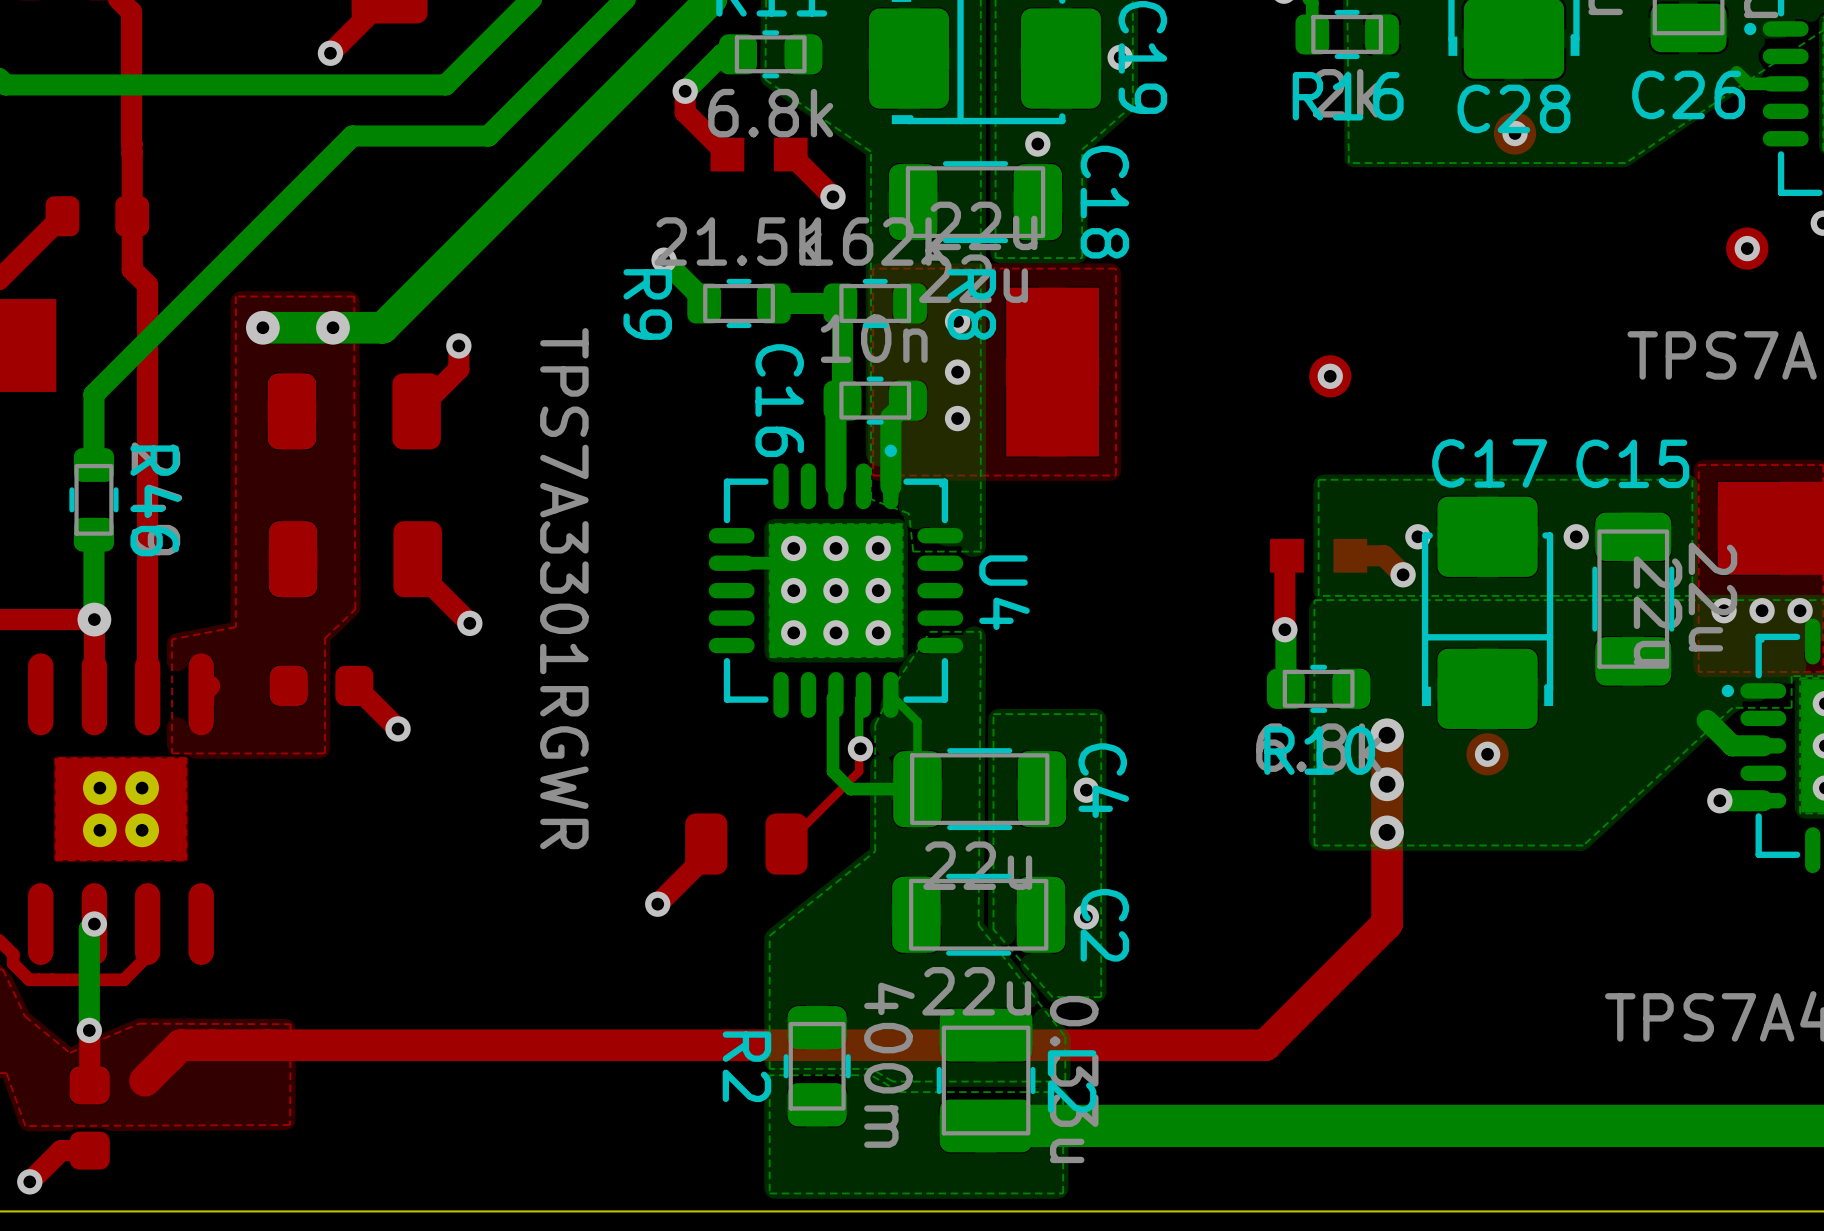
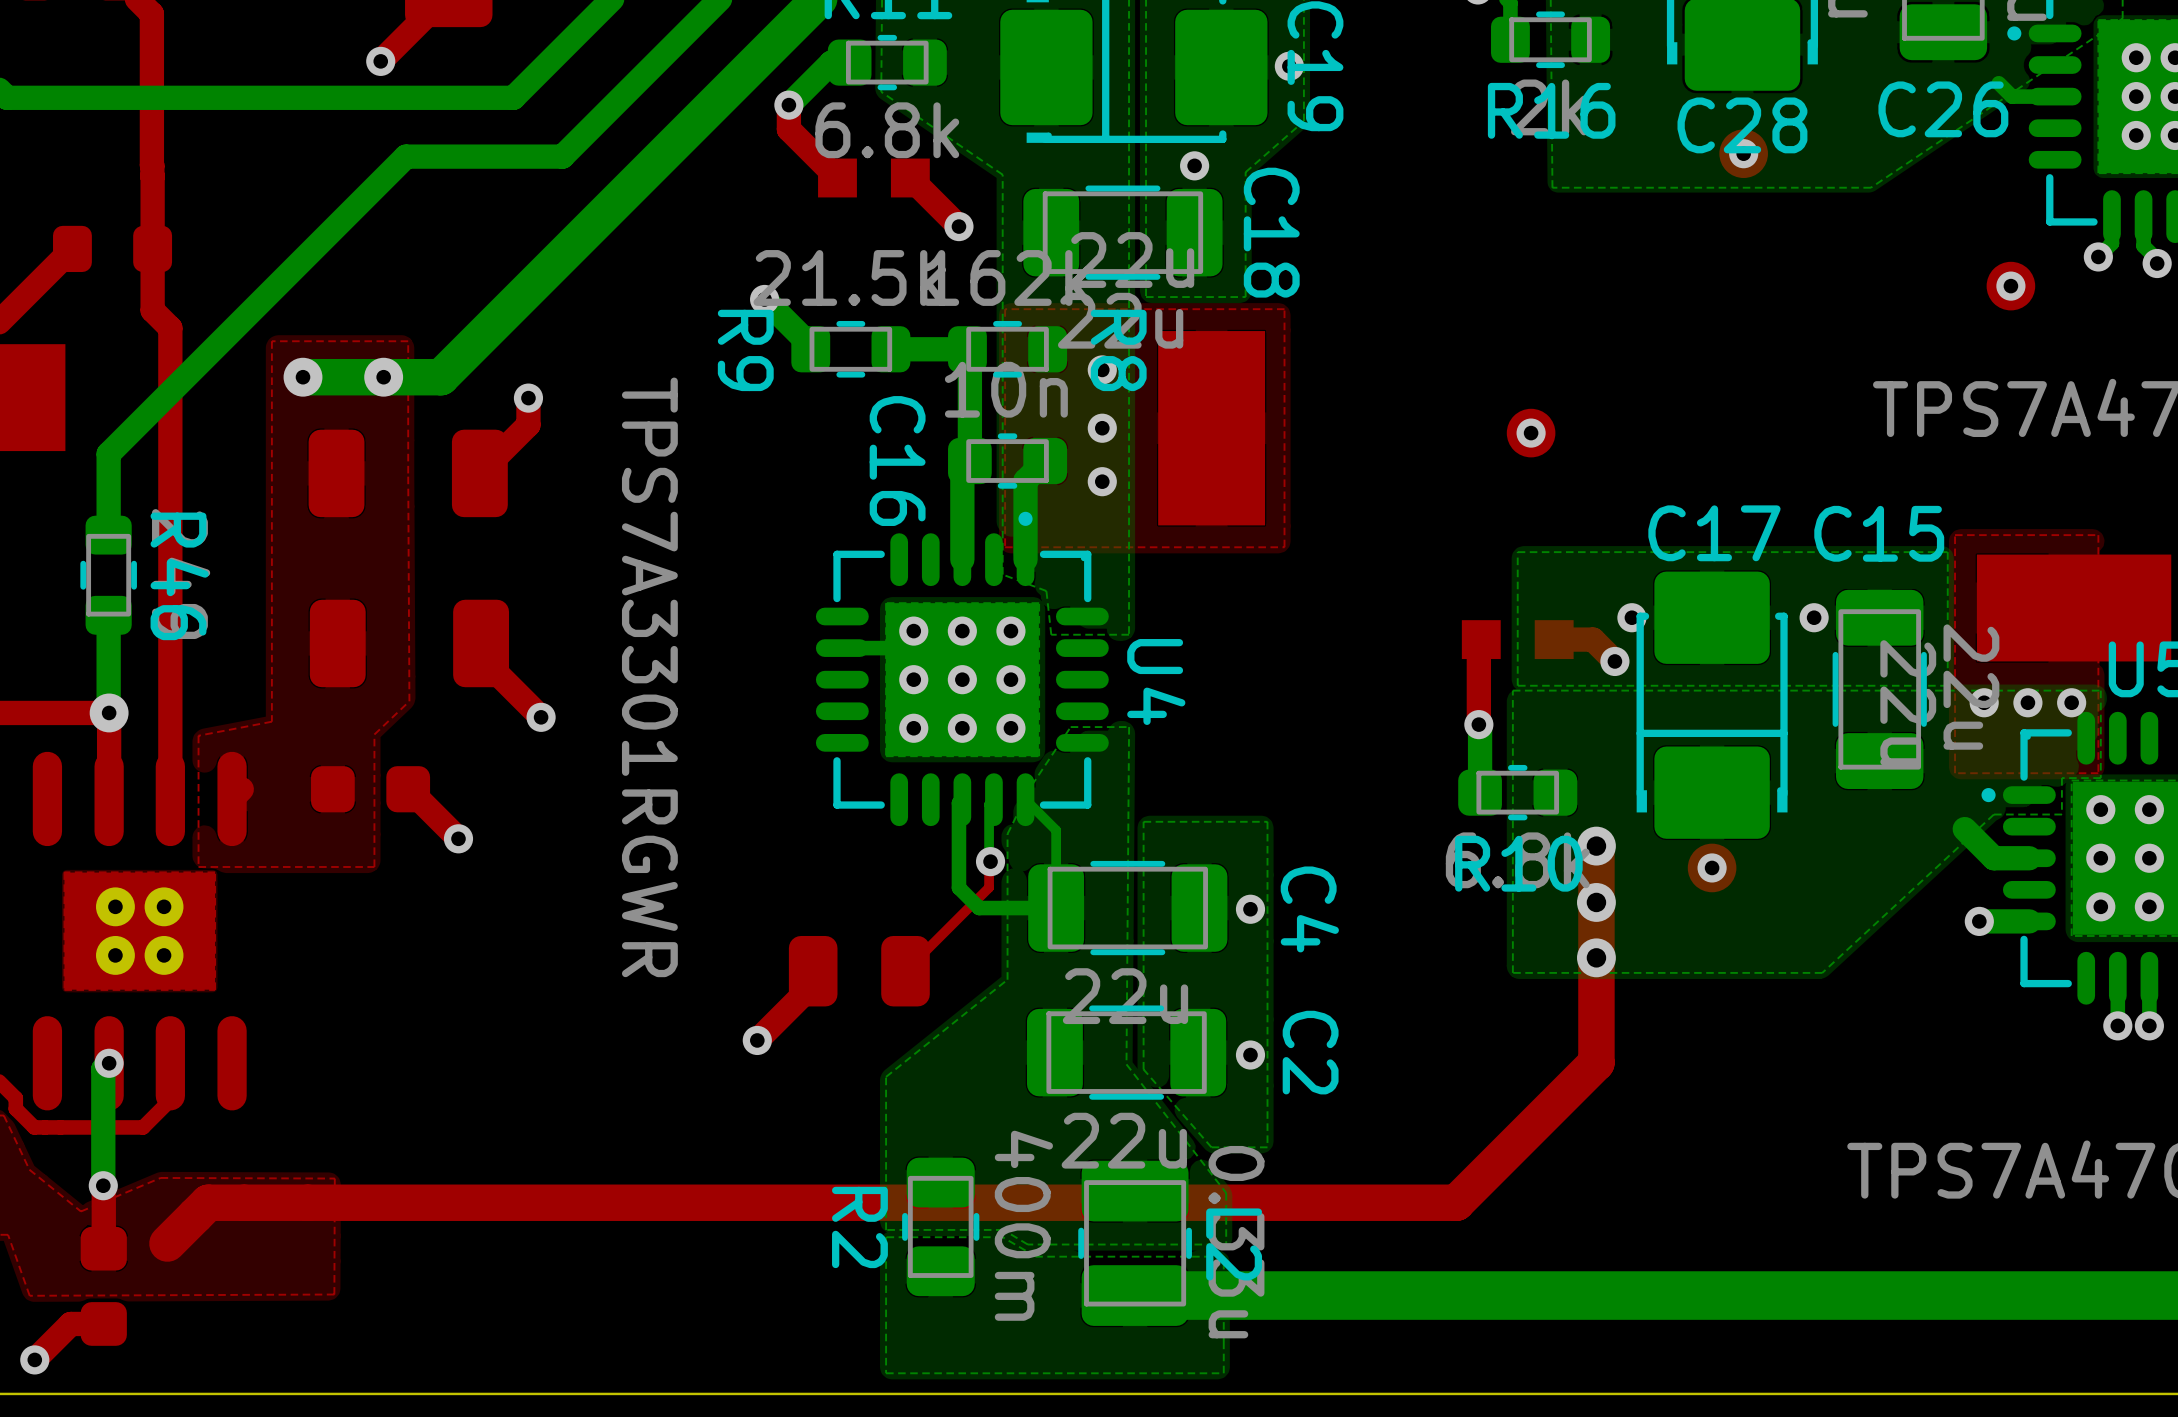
C4 name position: C4 (1103, 780) -> C4 (1309, 909)
C2 name position: C2 (1104, 925) -> C2 (1310, 1052)

